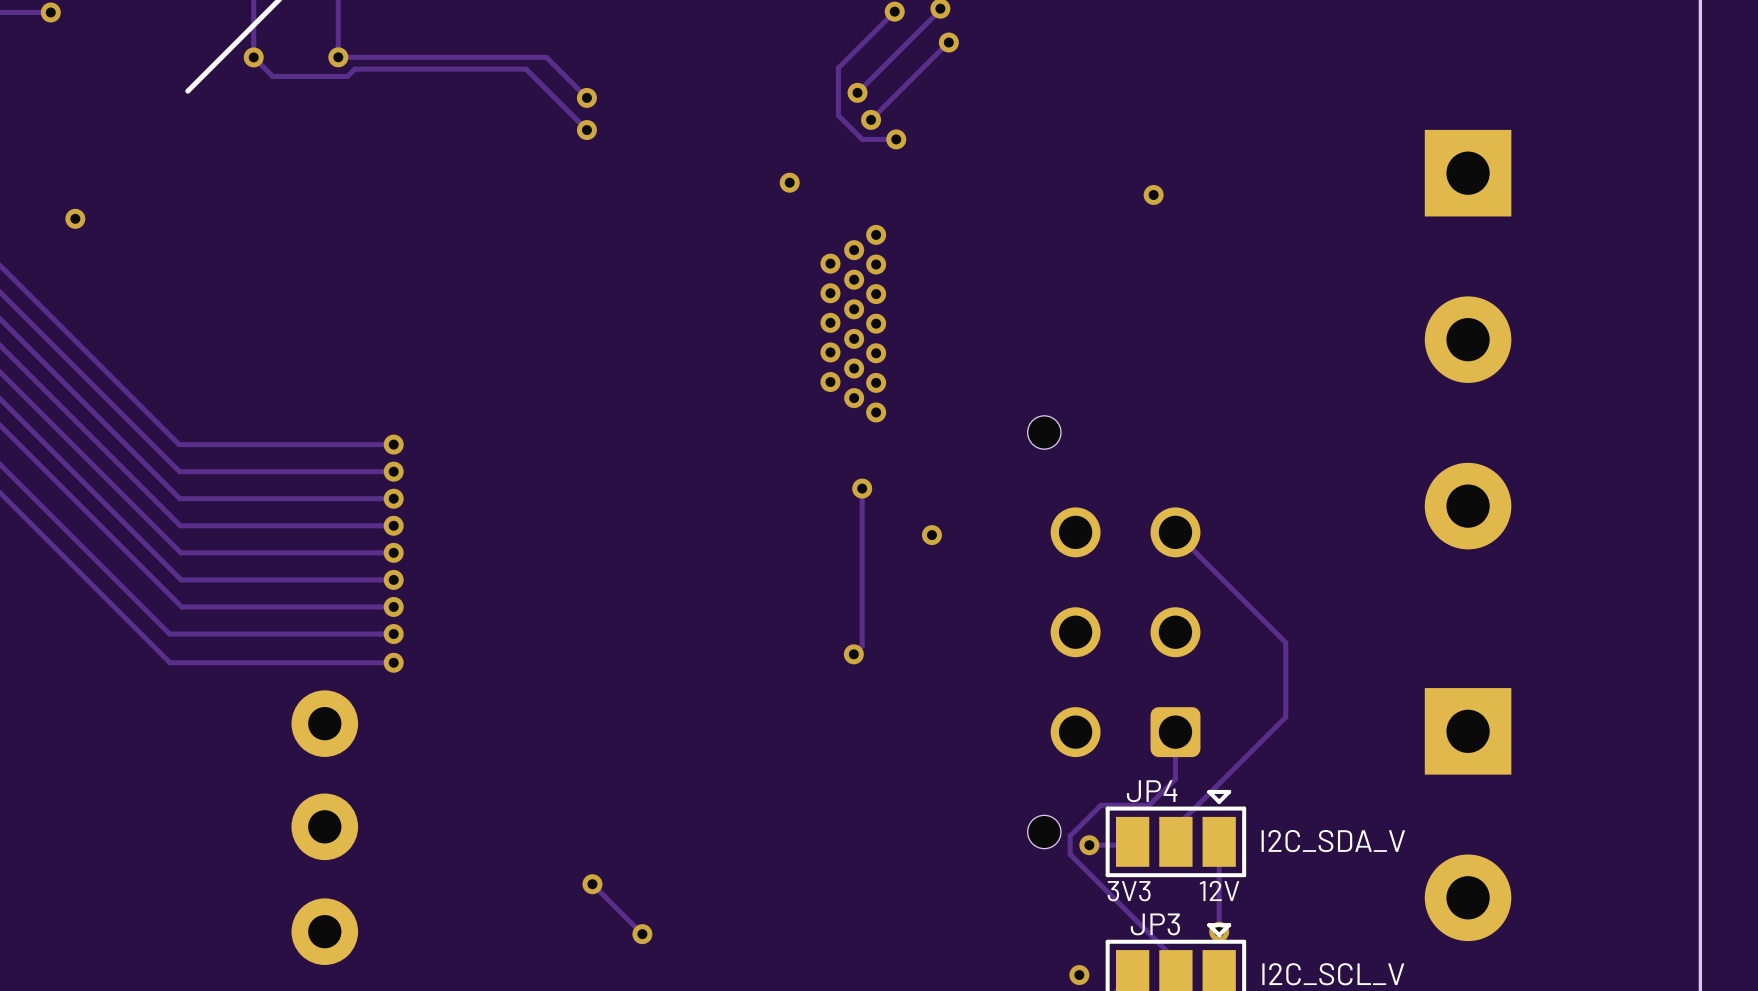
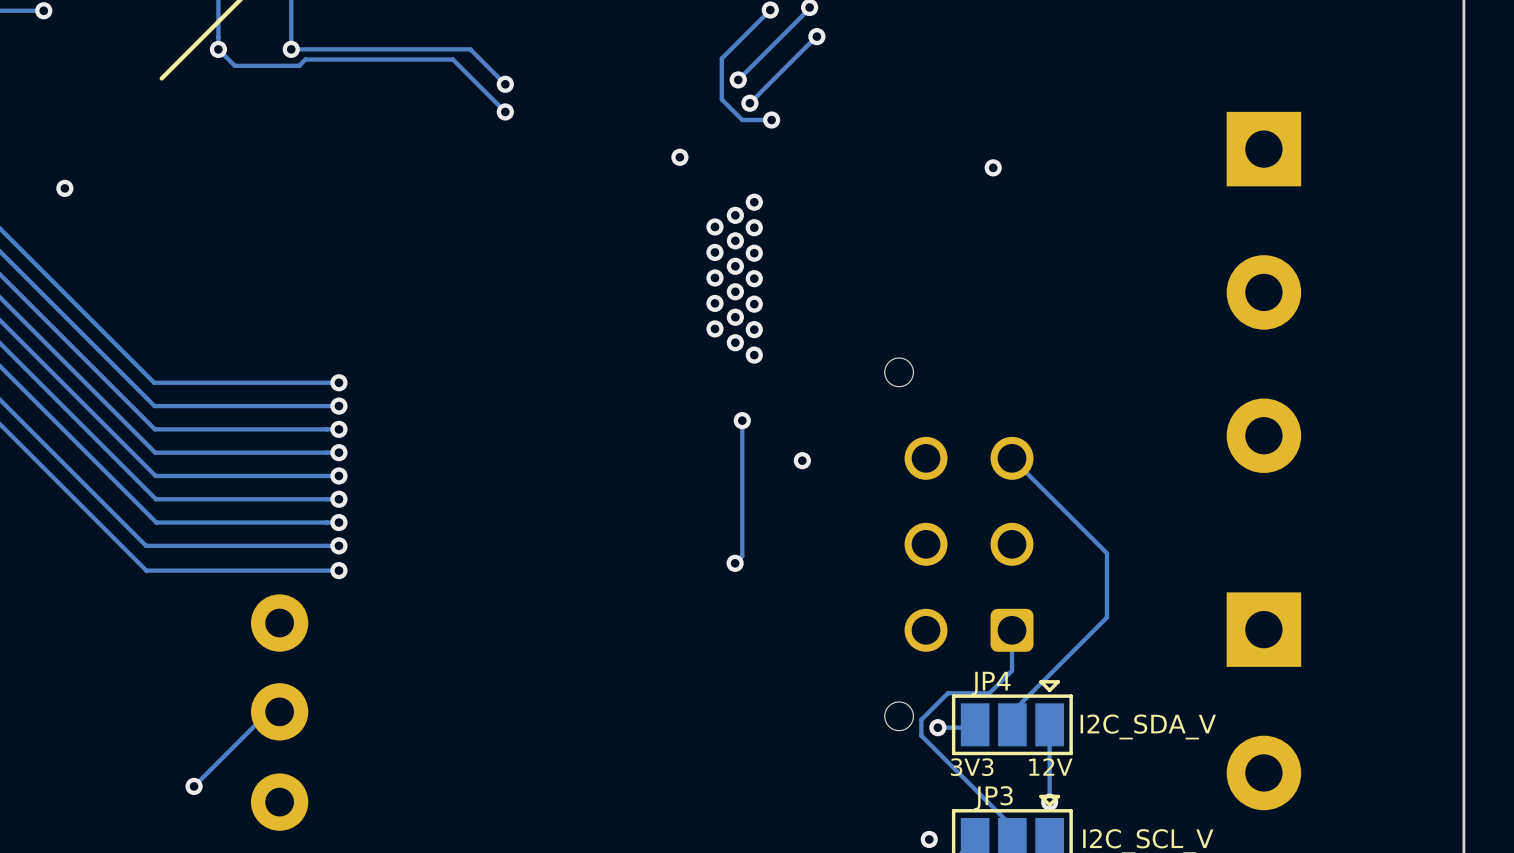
track: none -> (279, 711) (268, 711) (194, 786)
track: (592, 884) (642, 934) -> none
via: (592, 884) -> none
via: none -> (194, 786)
via: (642, 934) -> none

